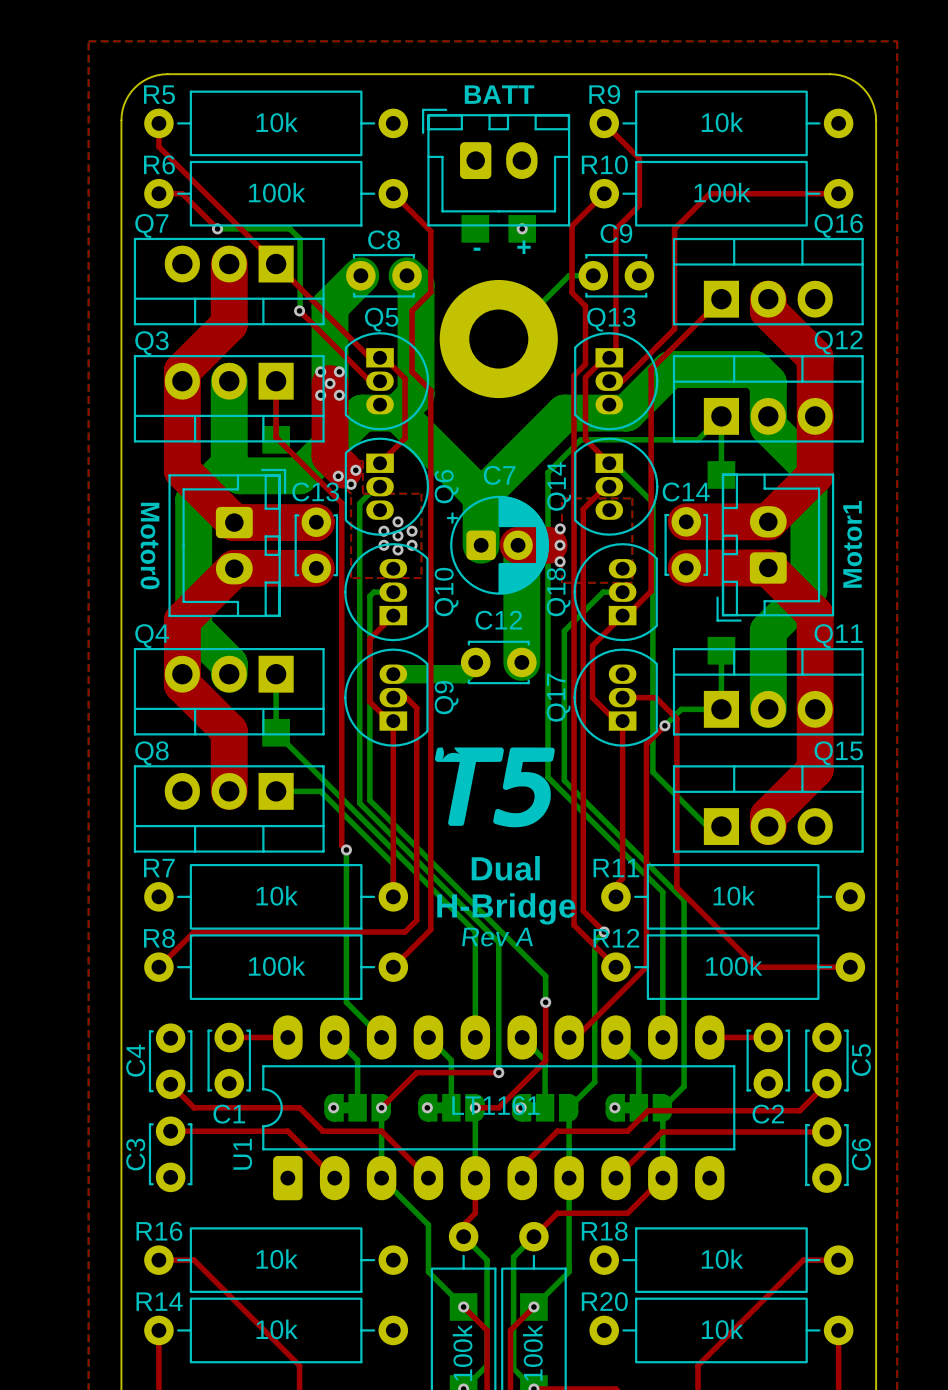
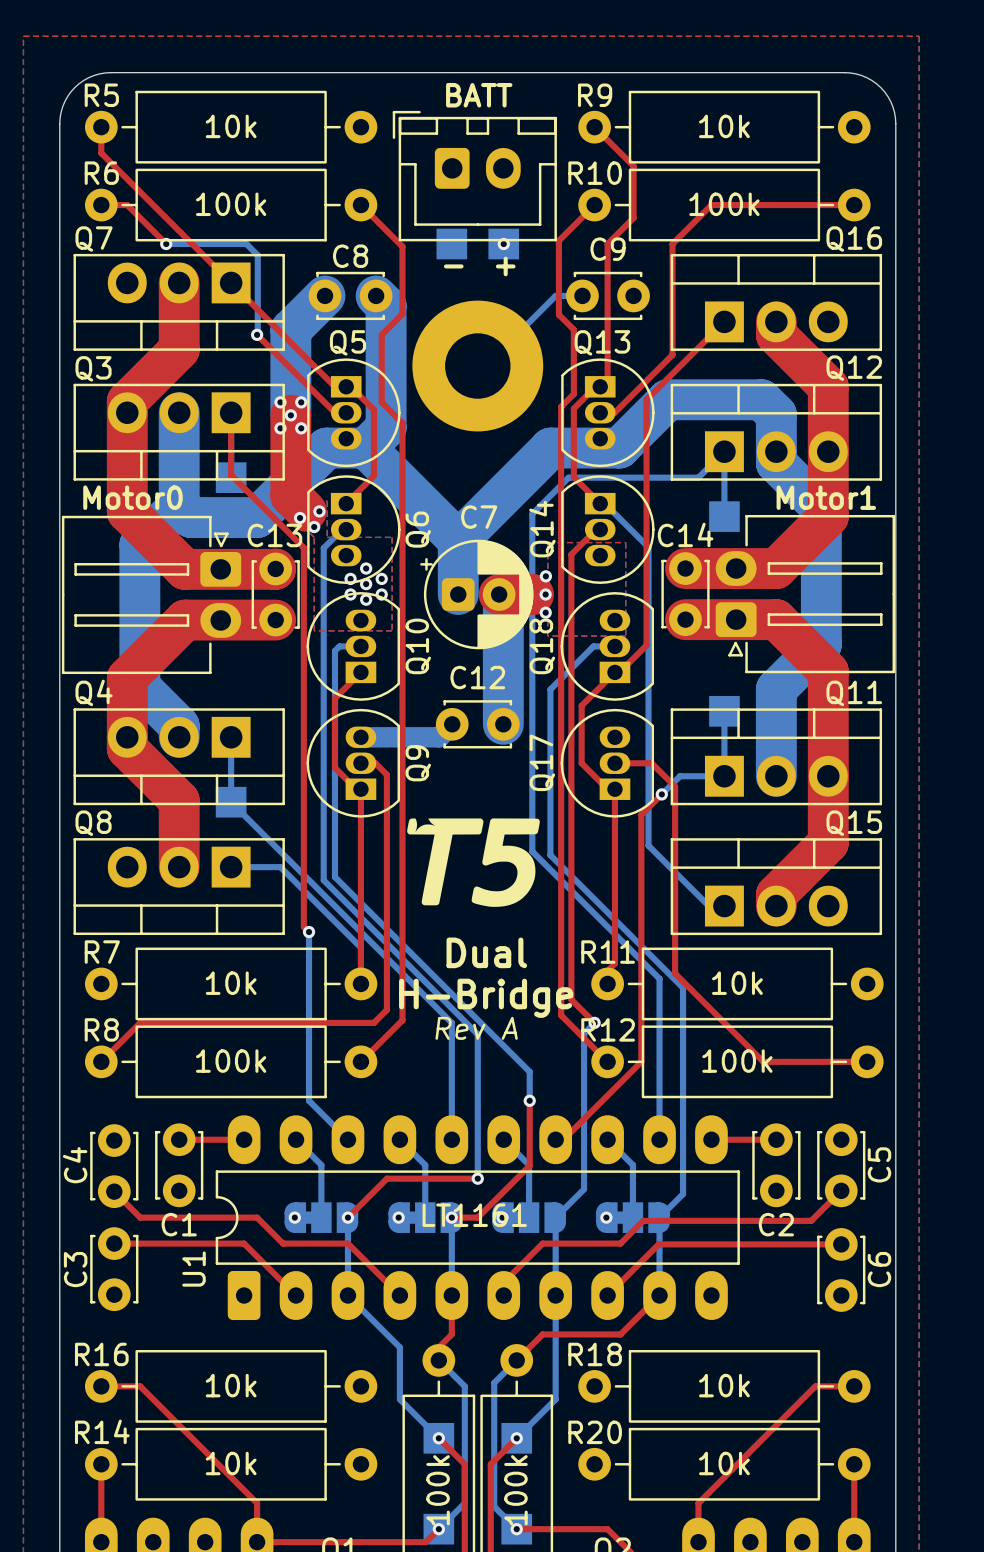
part: Motor0 (227, 542) -> none
part: none -> Motor1 (805, 594)
part: none -> Motor0 (151, 594)
part: Motor1 (775, 547) -> none

